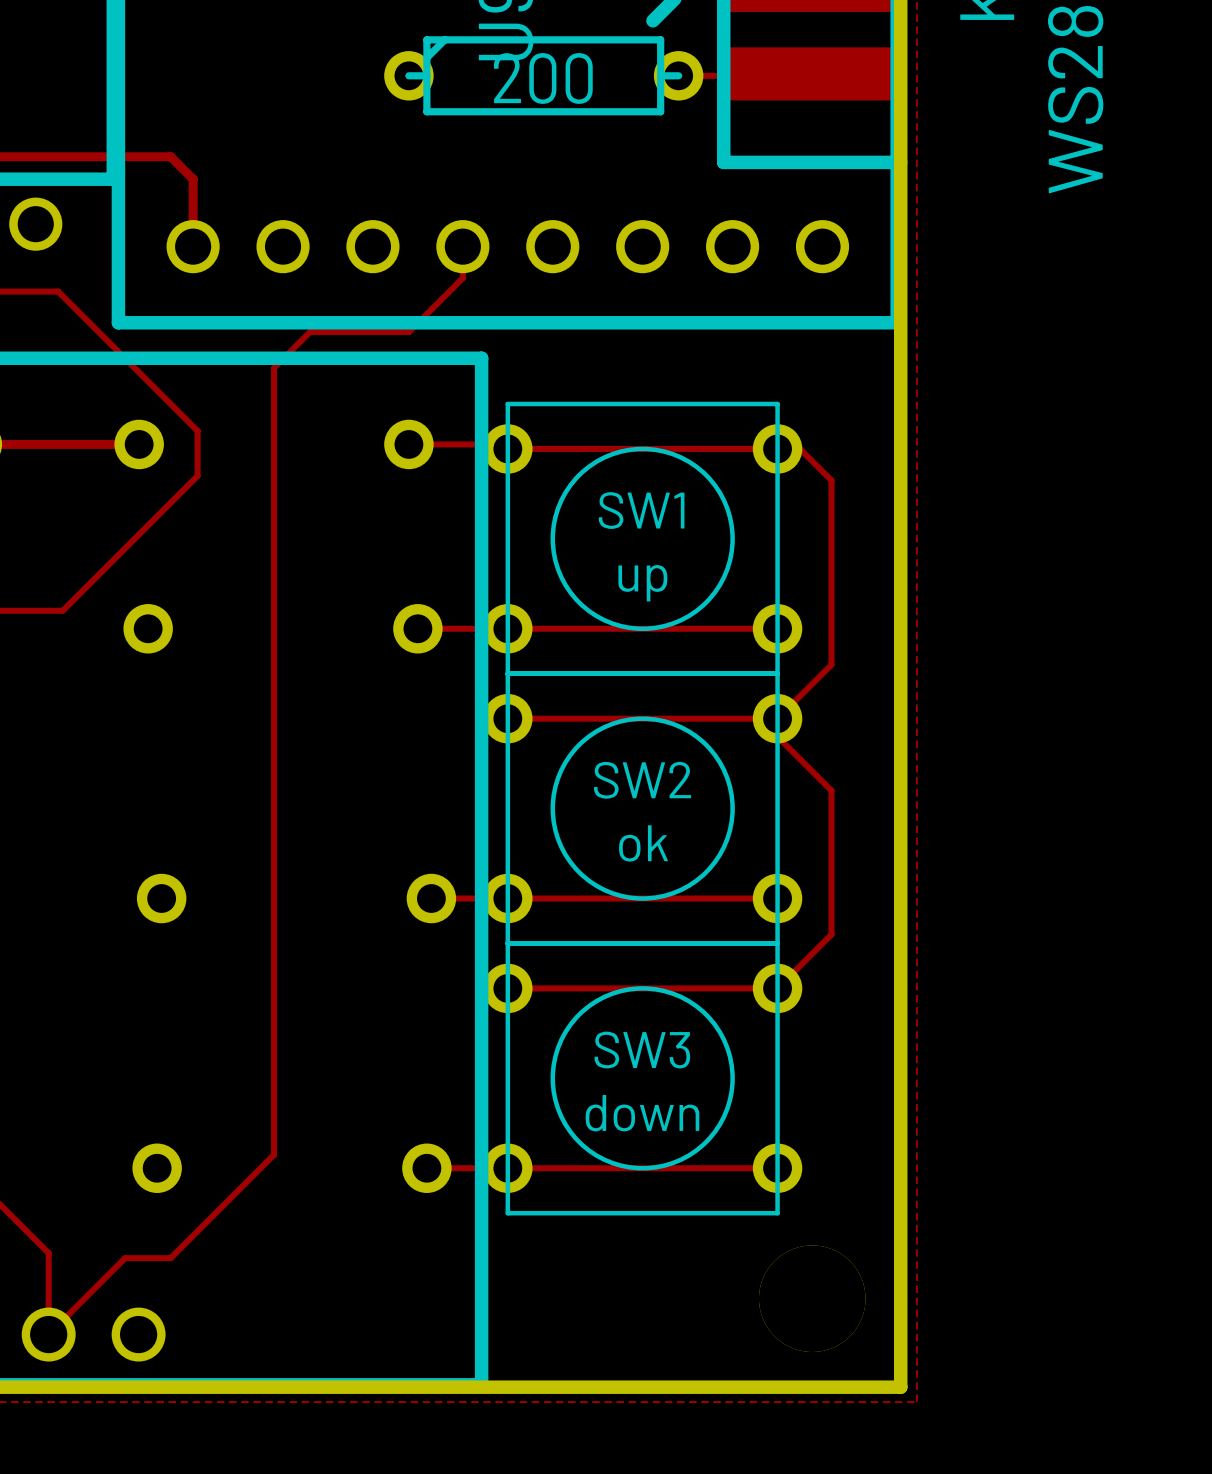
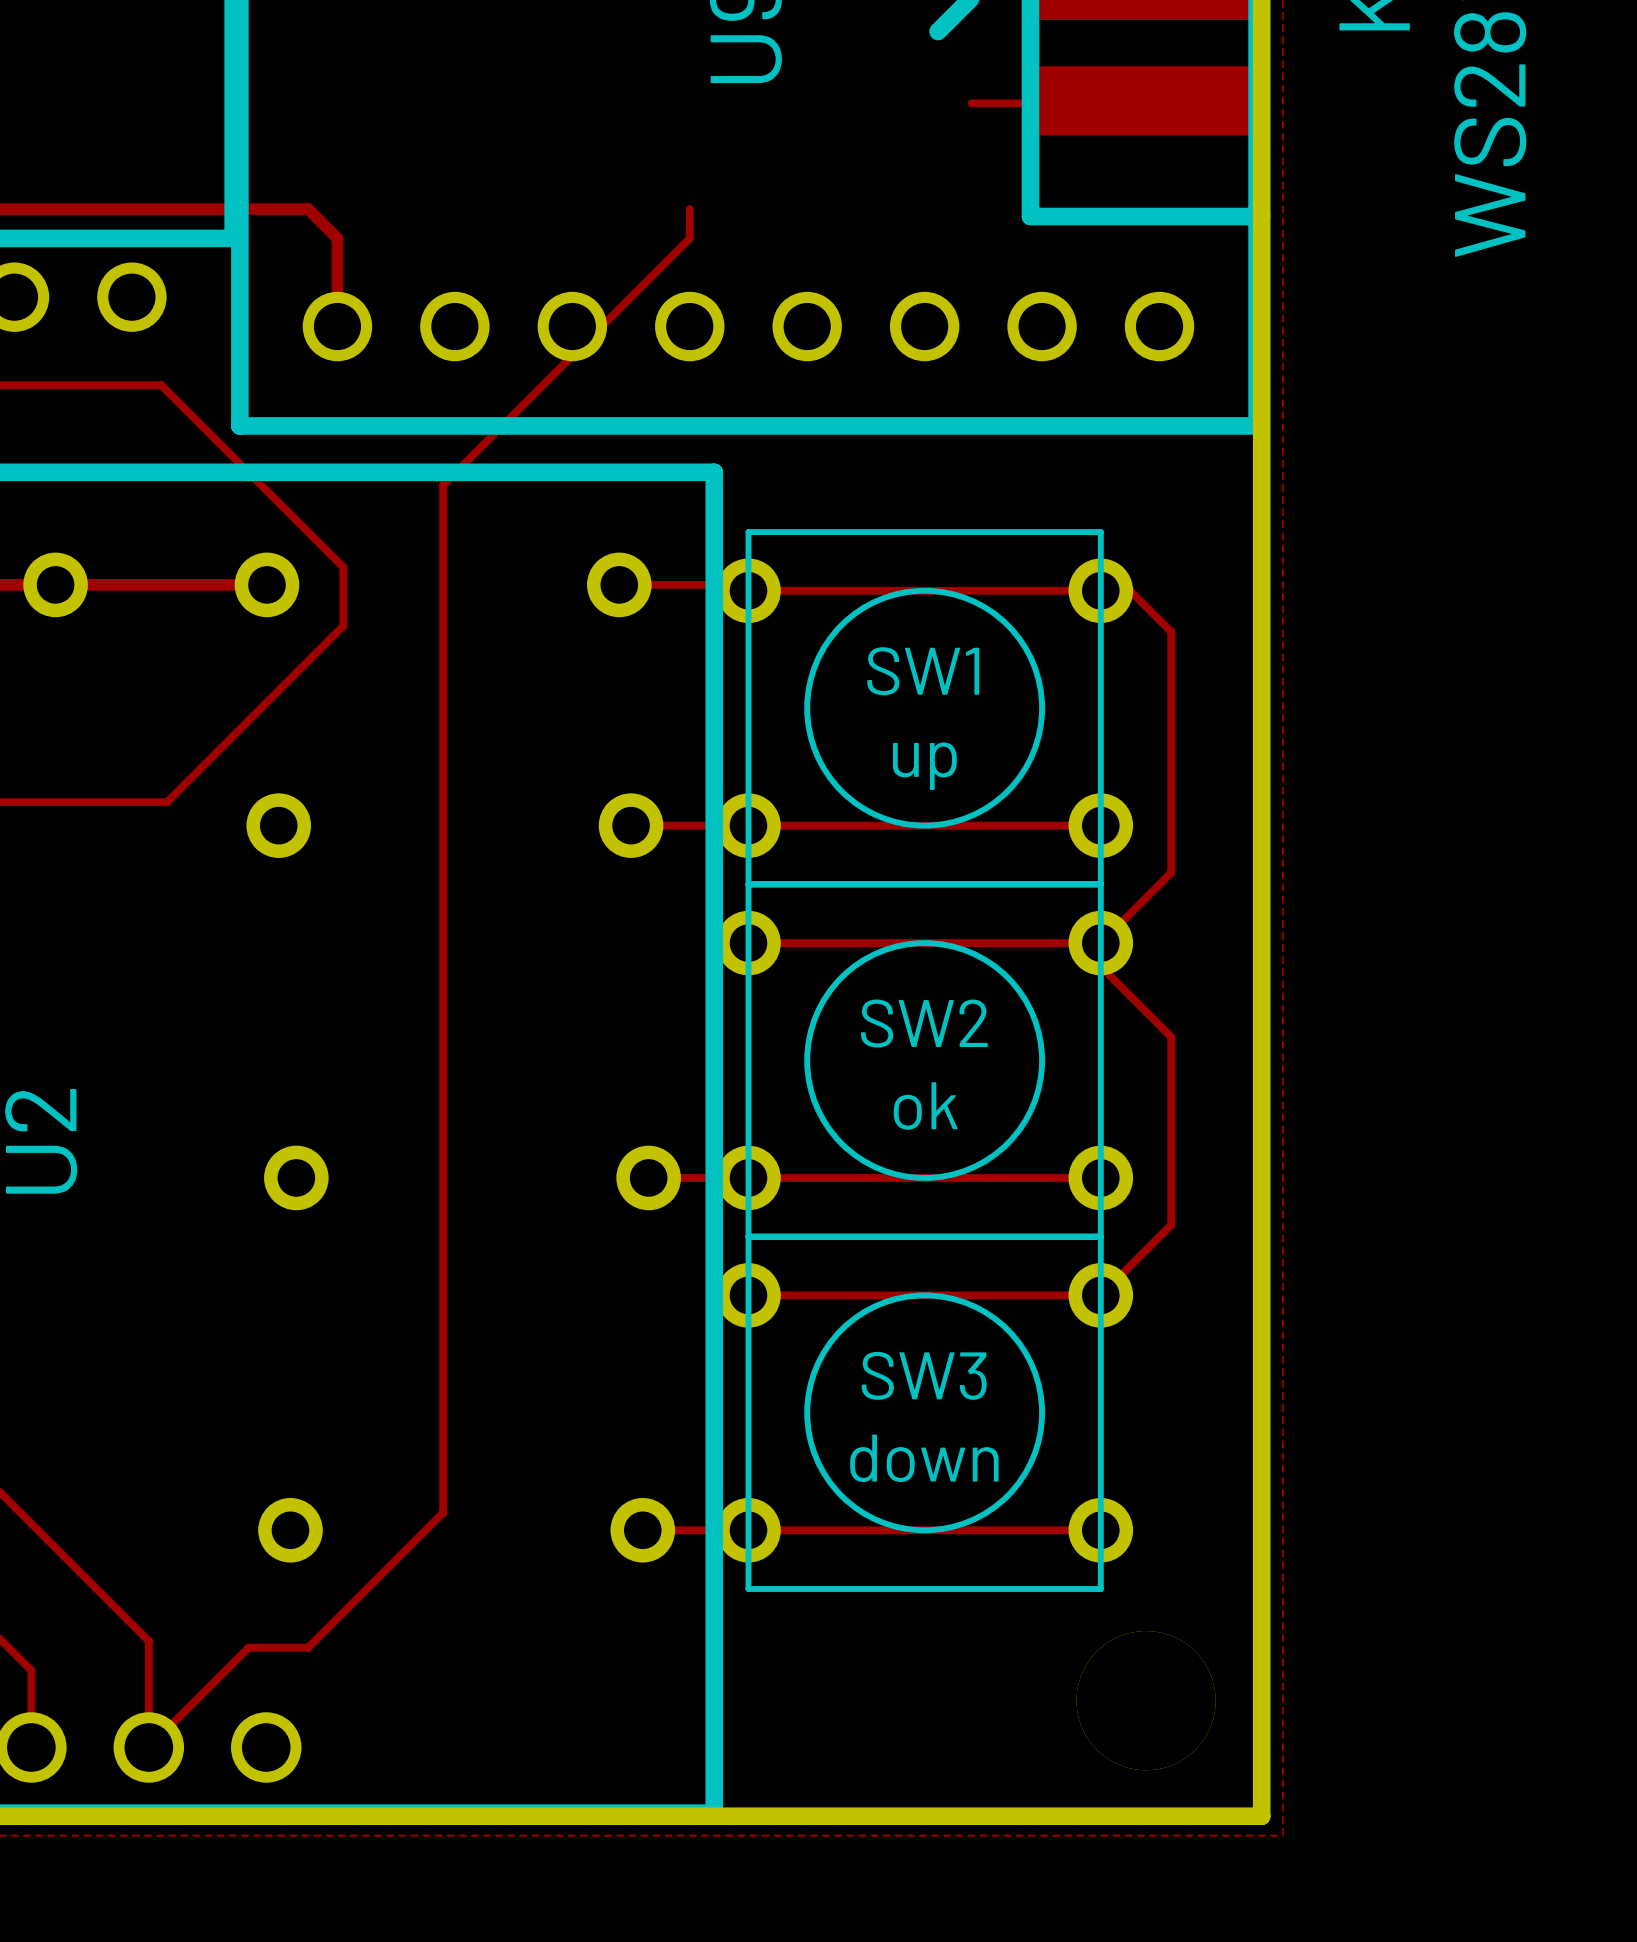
part: 200 (543, 75) -> none
track: (462, 246) (462, 278) (408, 332) (310, 332) -> (689, 209) (689, 238) (490, 438)

